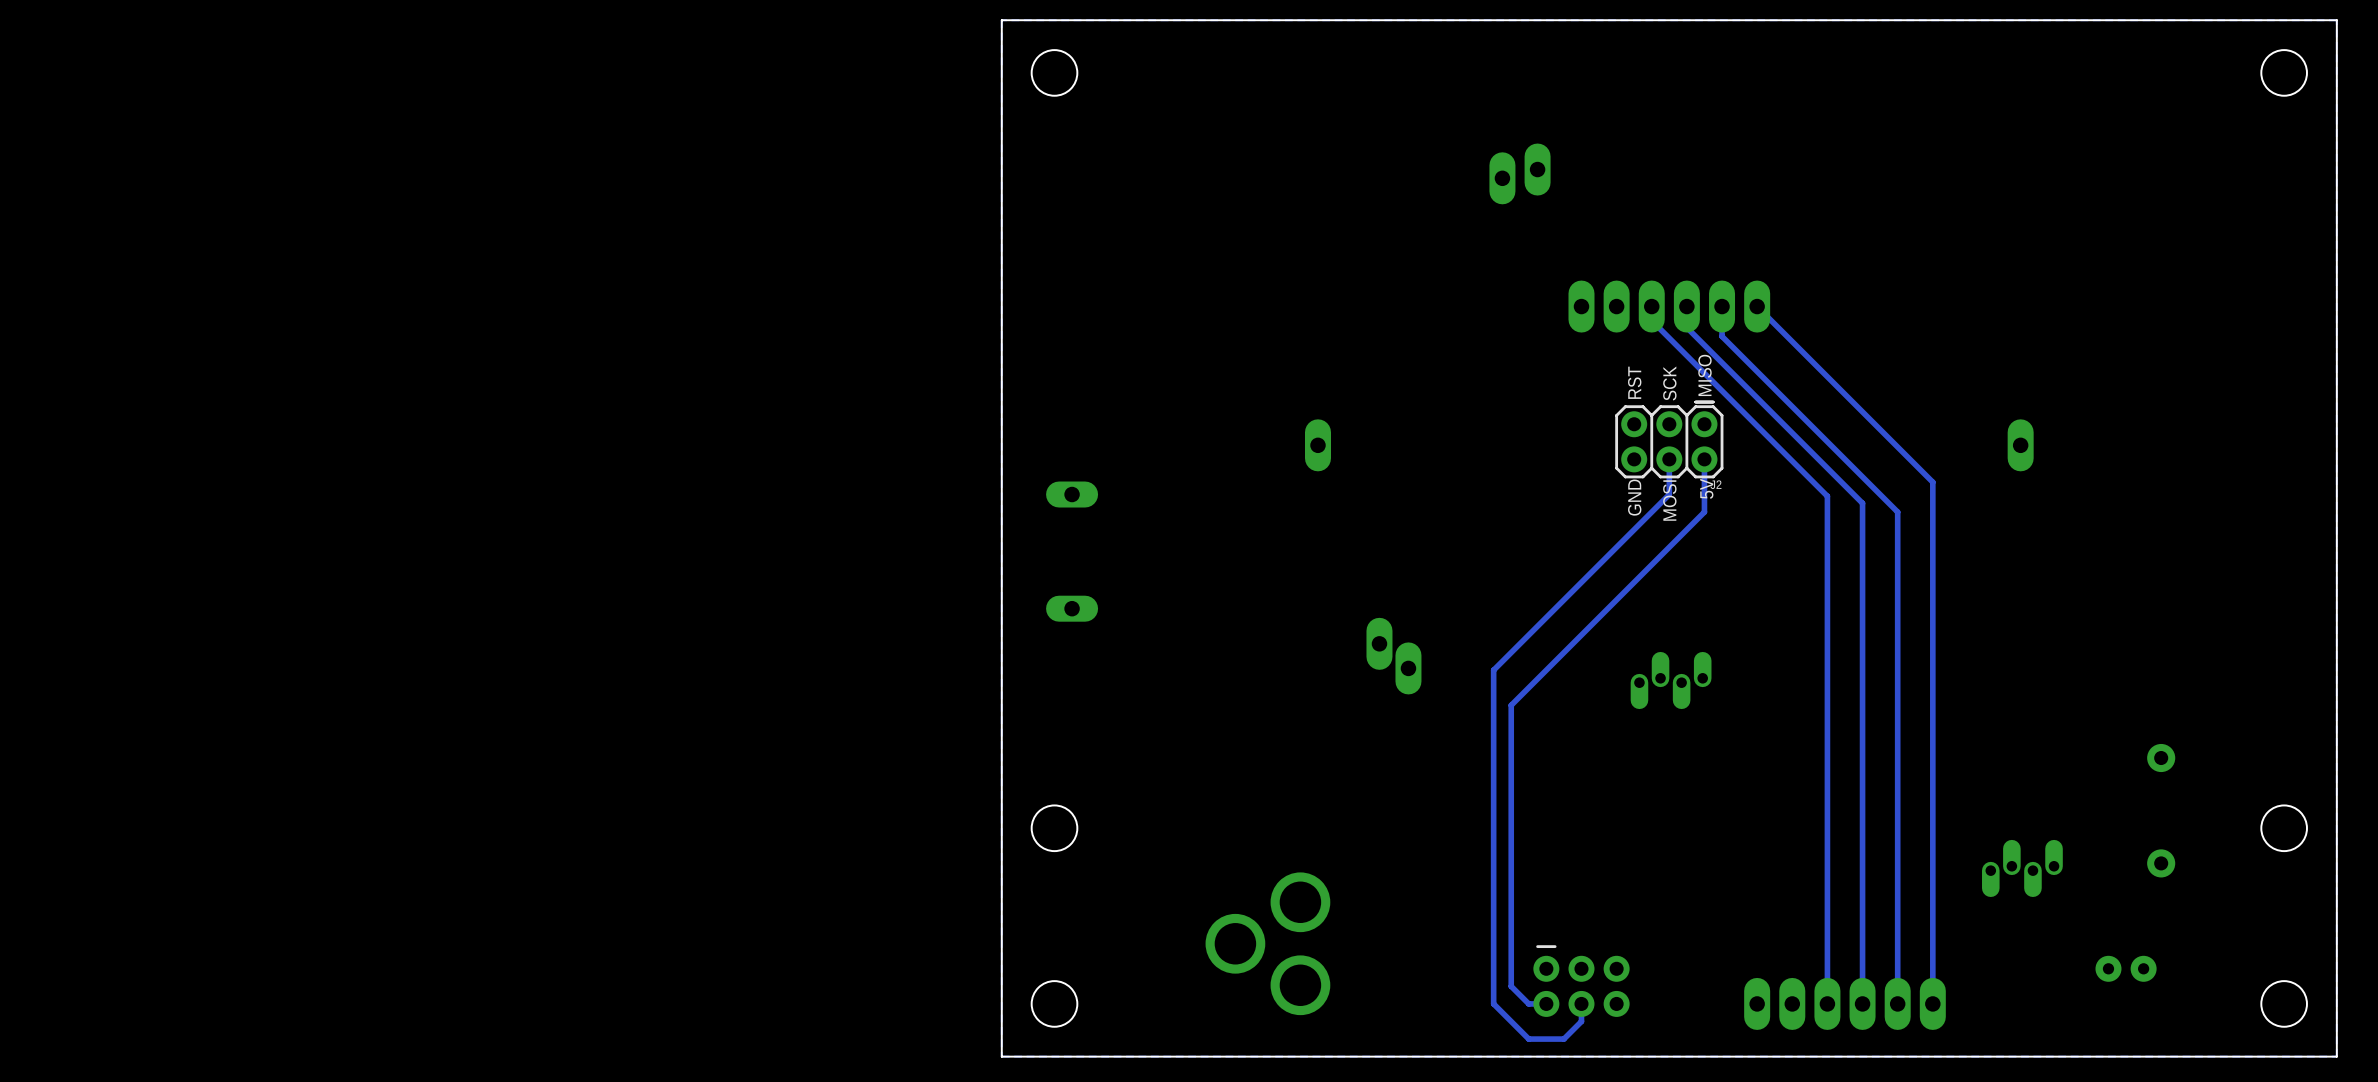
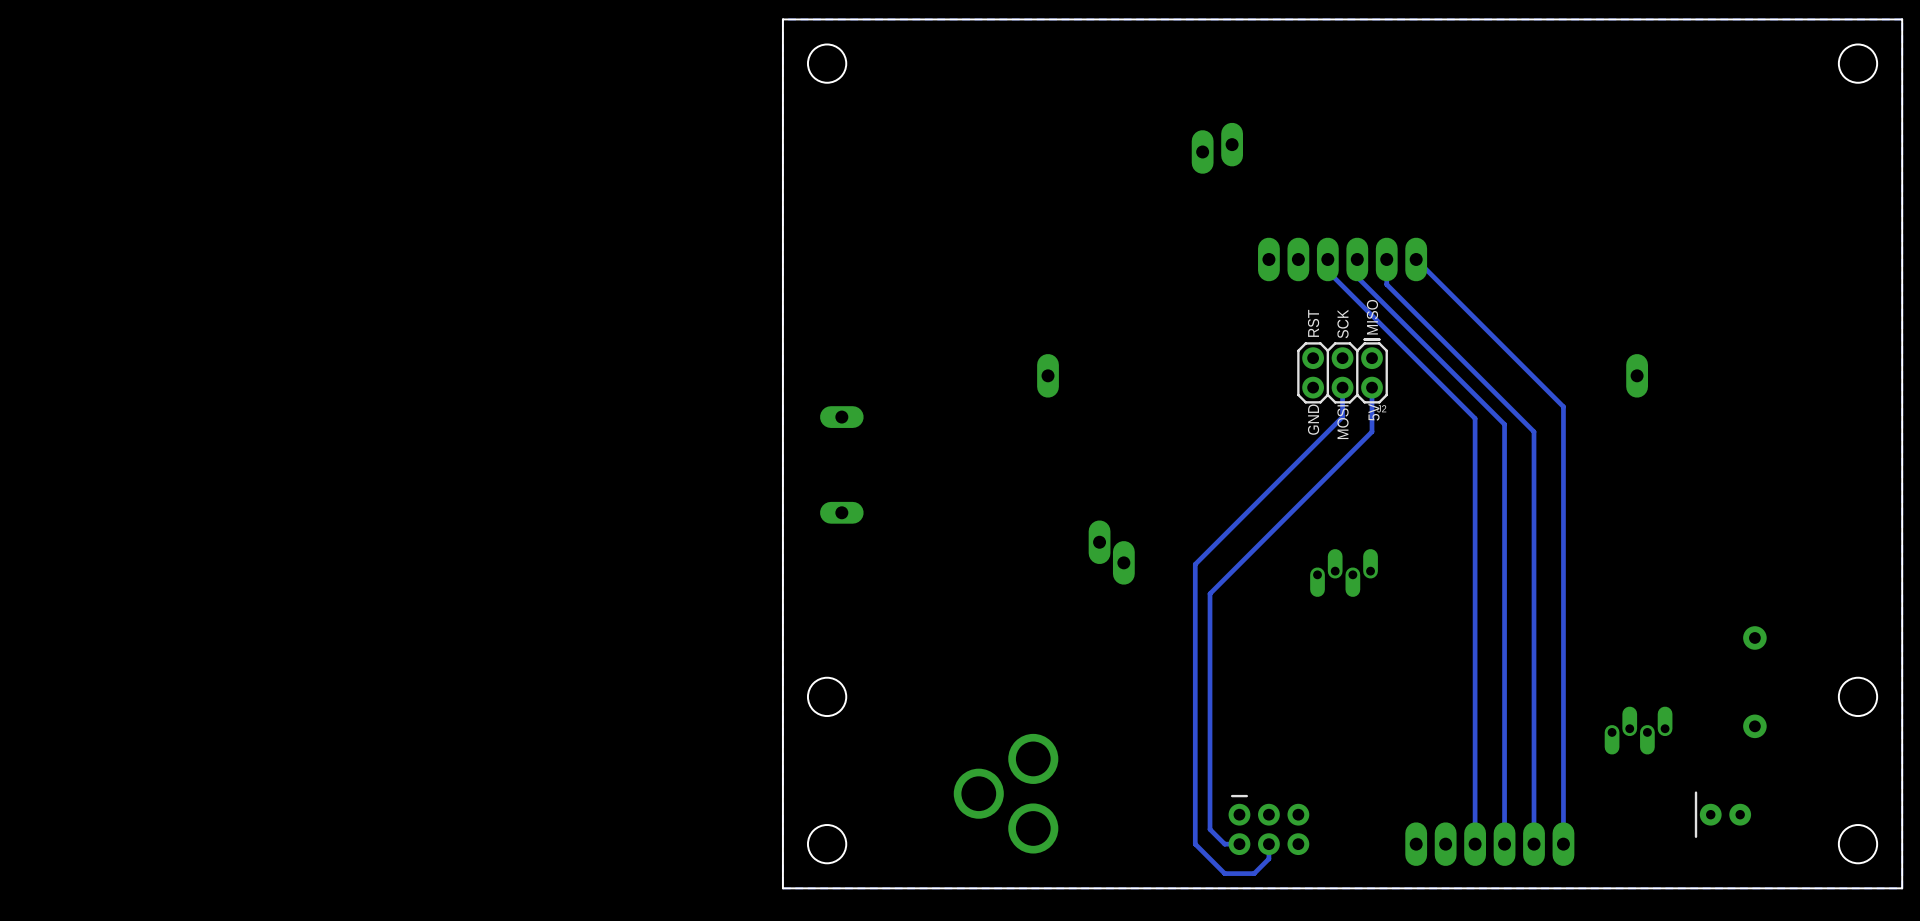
part footprint: [2095, 955, 2157, 982] -> [1694, 791, 1752, 838]

